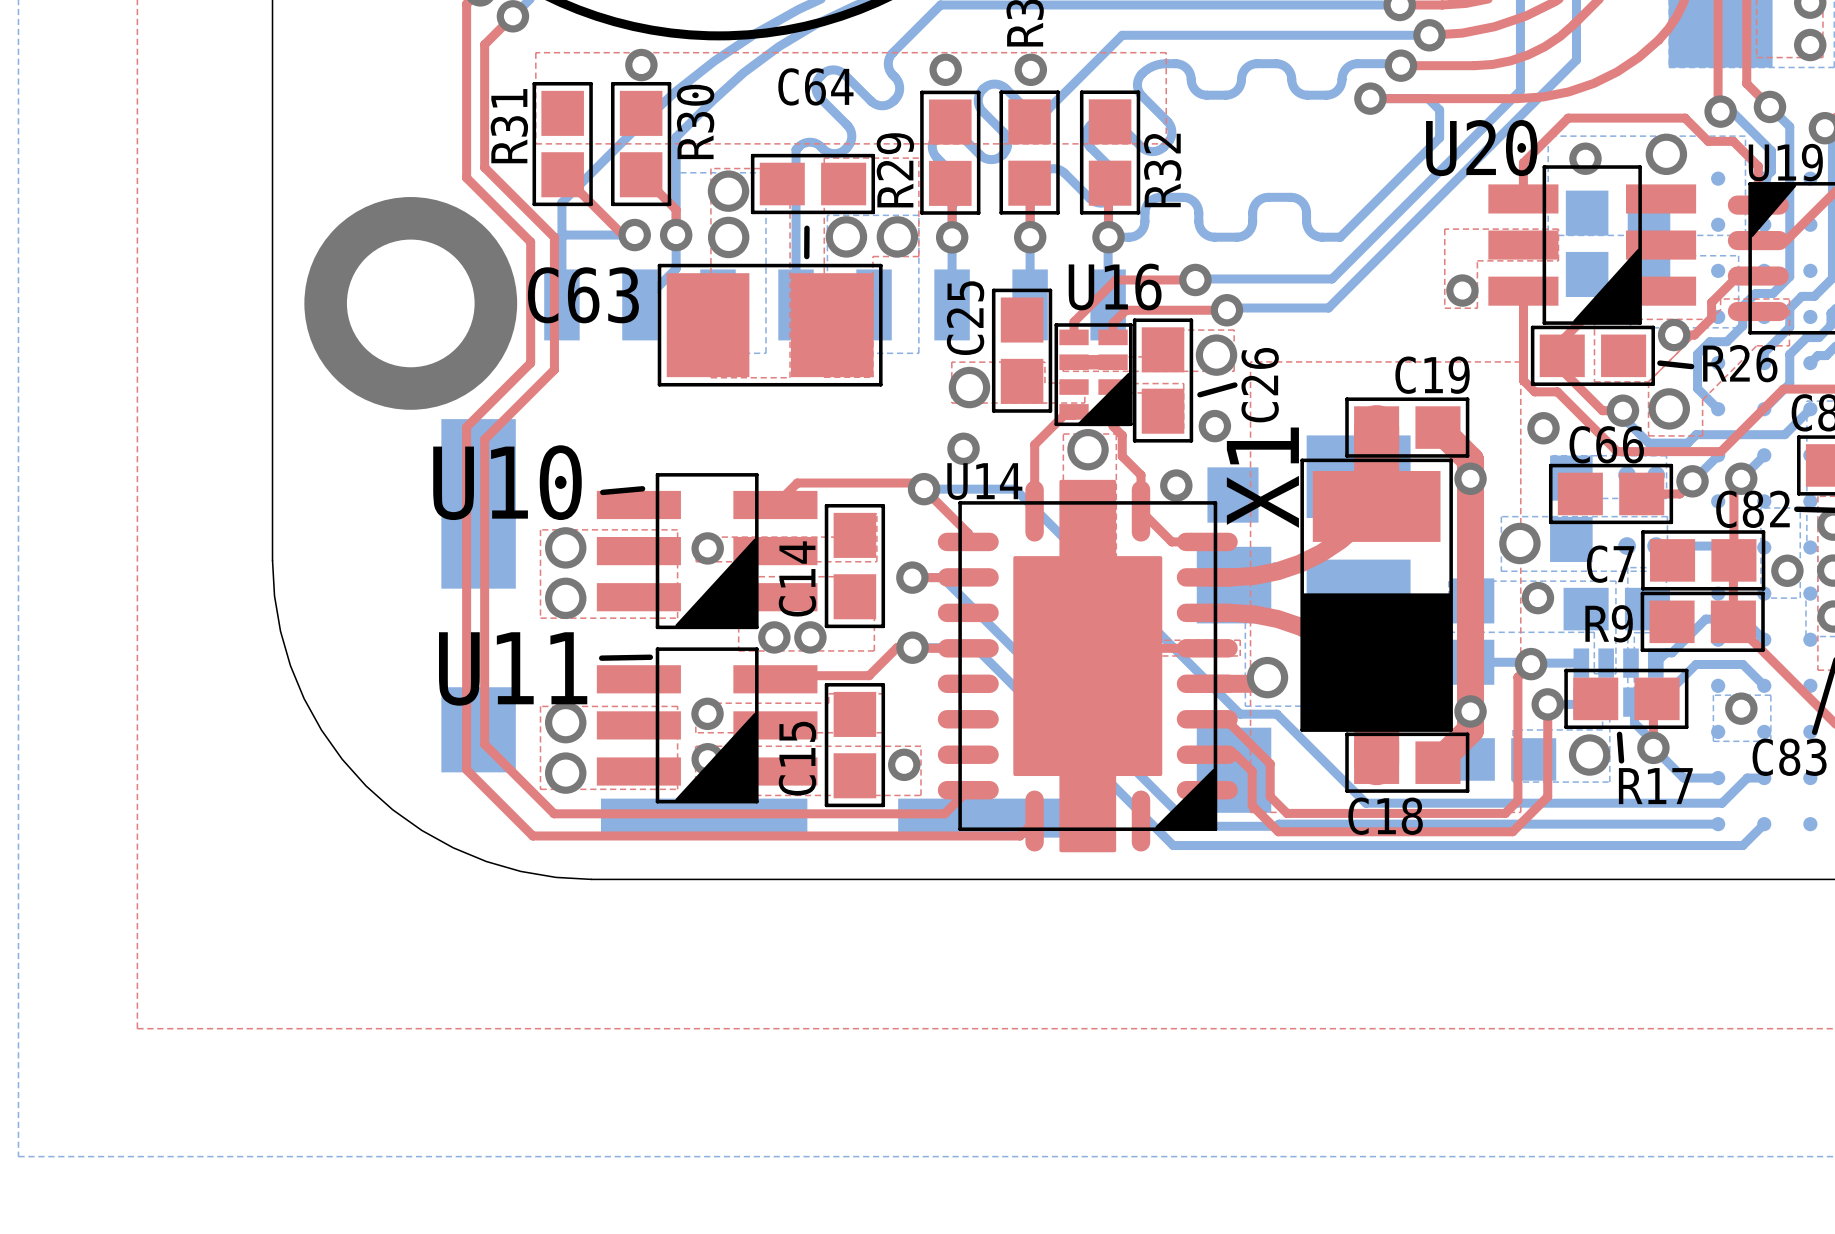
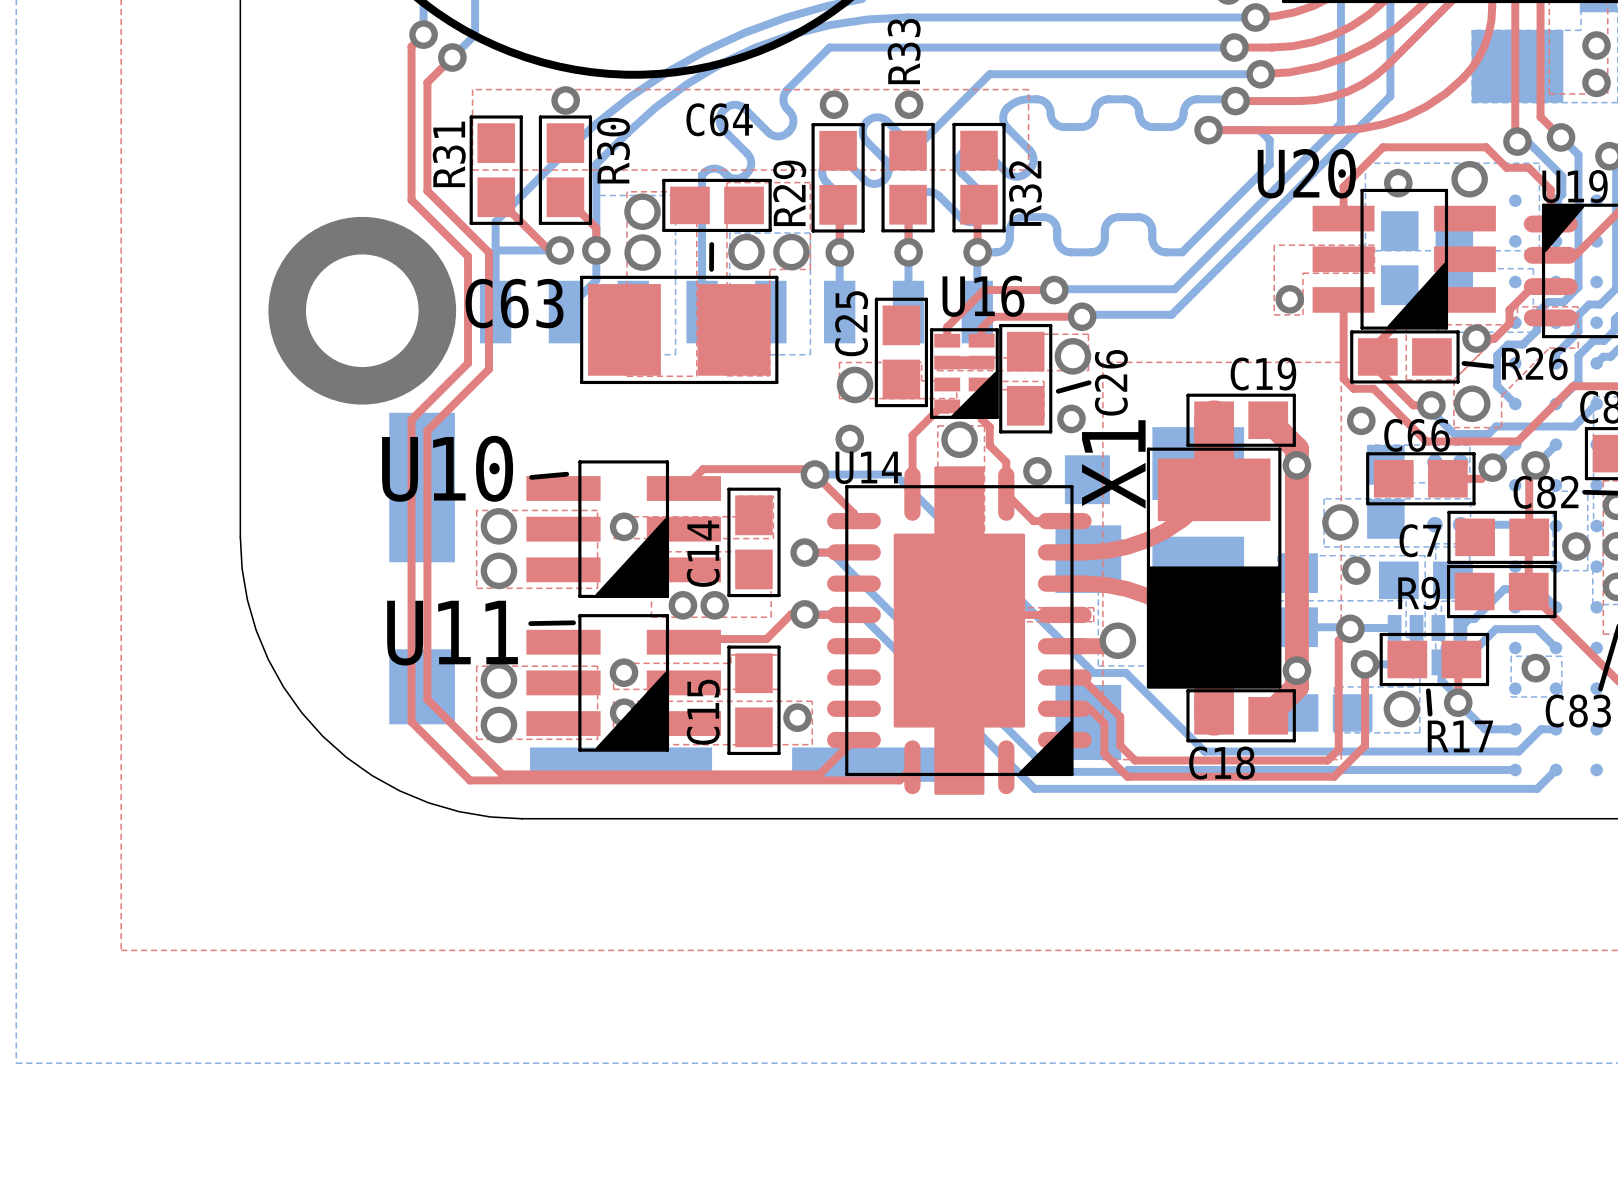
top track: (554, 813) (944, 813) -> (488, 760) (502, 774) (819, 774) (833, 760)

